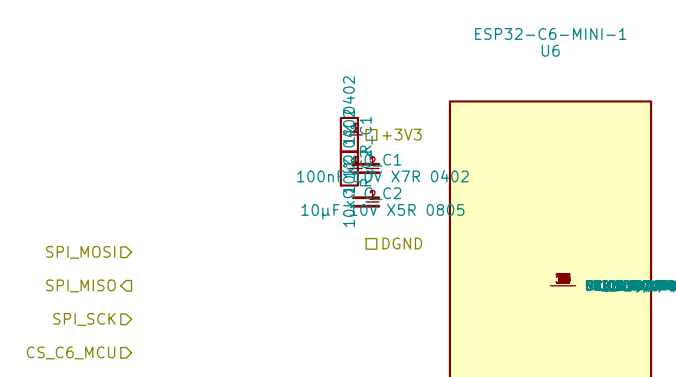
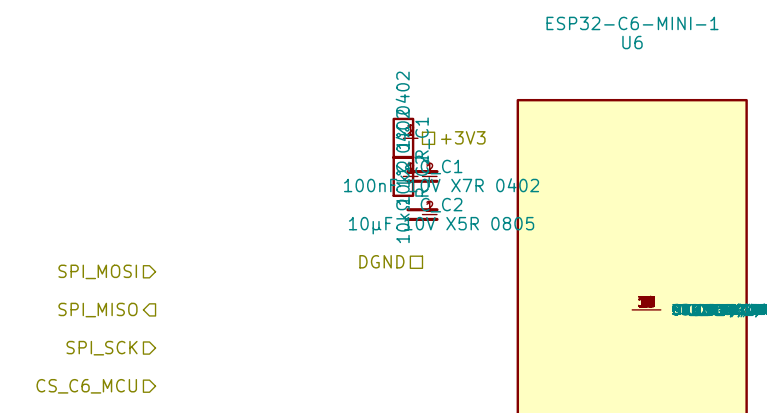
hierarchical label rotation: 0° (402, 243) -> 180° (381, 261)
hierarchical label position: DGND (402, 243) -> DGND (381, 261)

